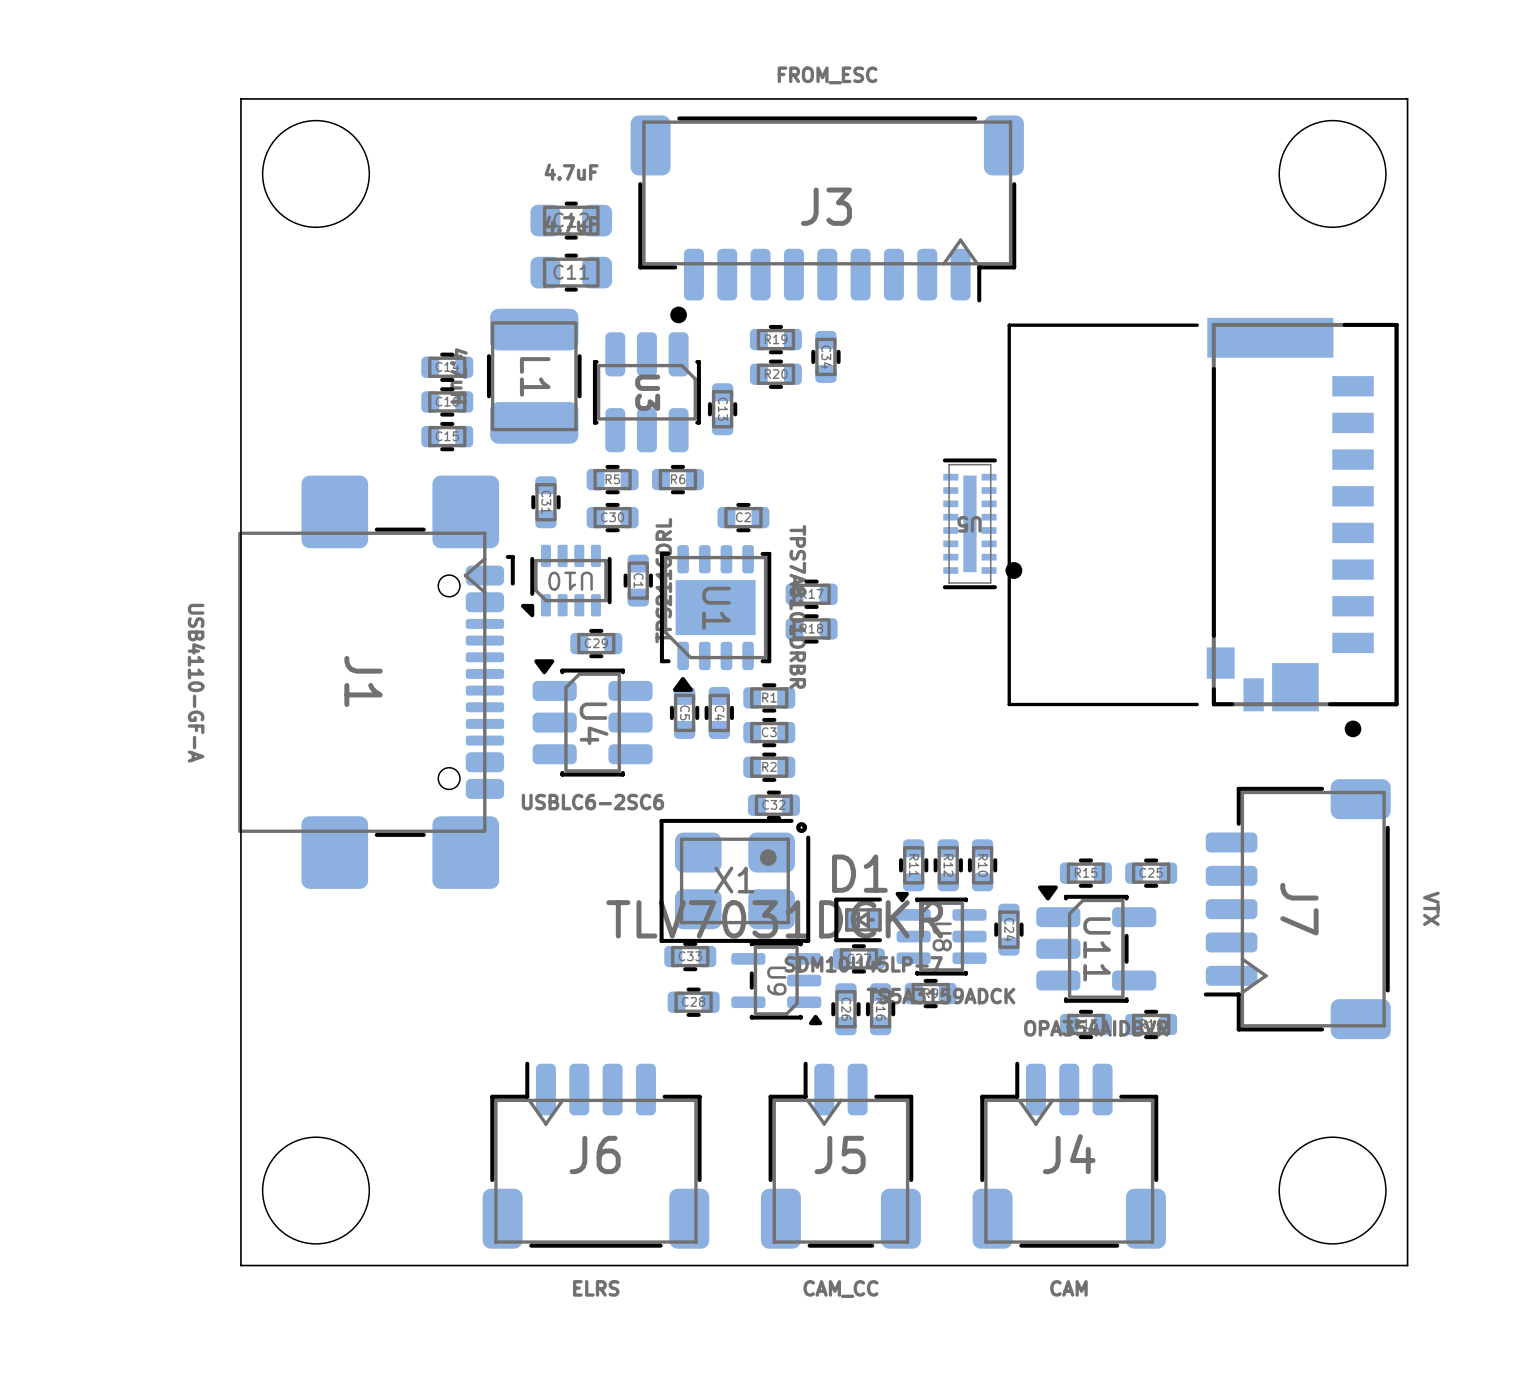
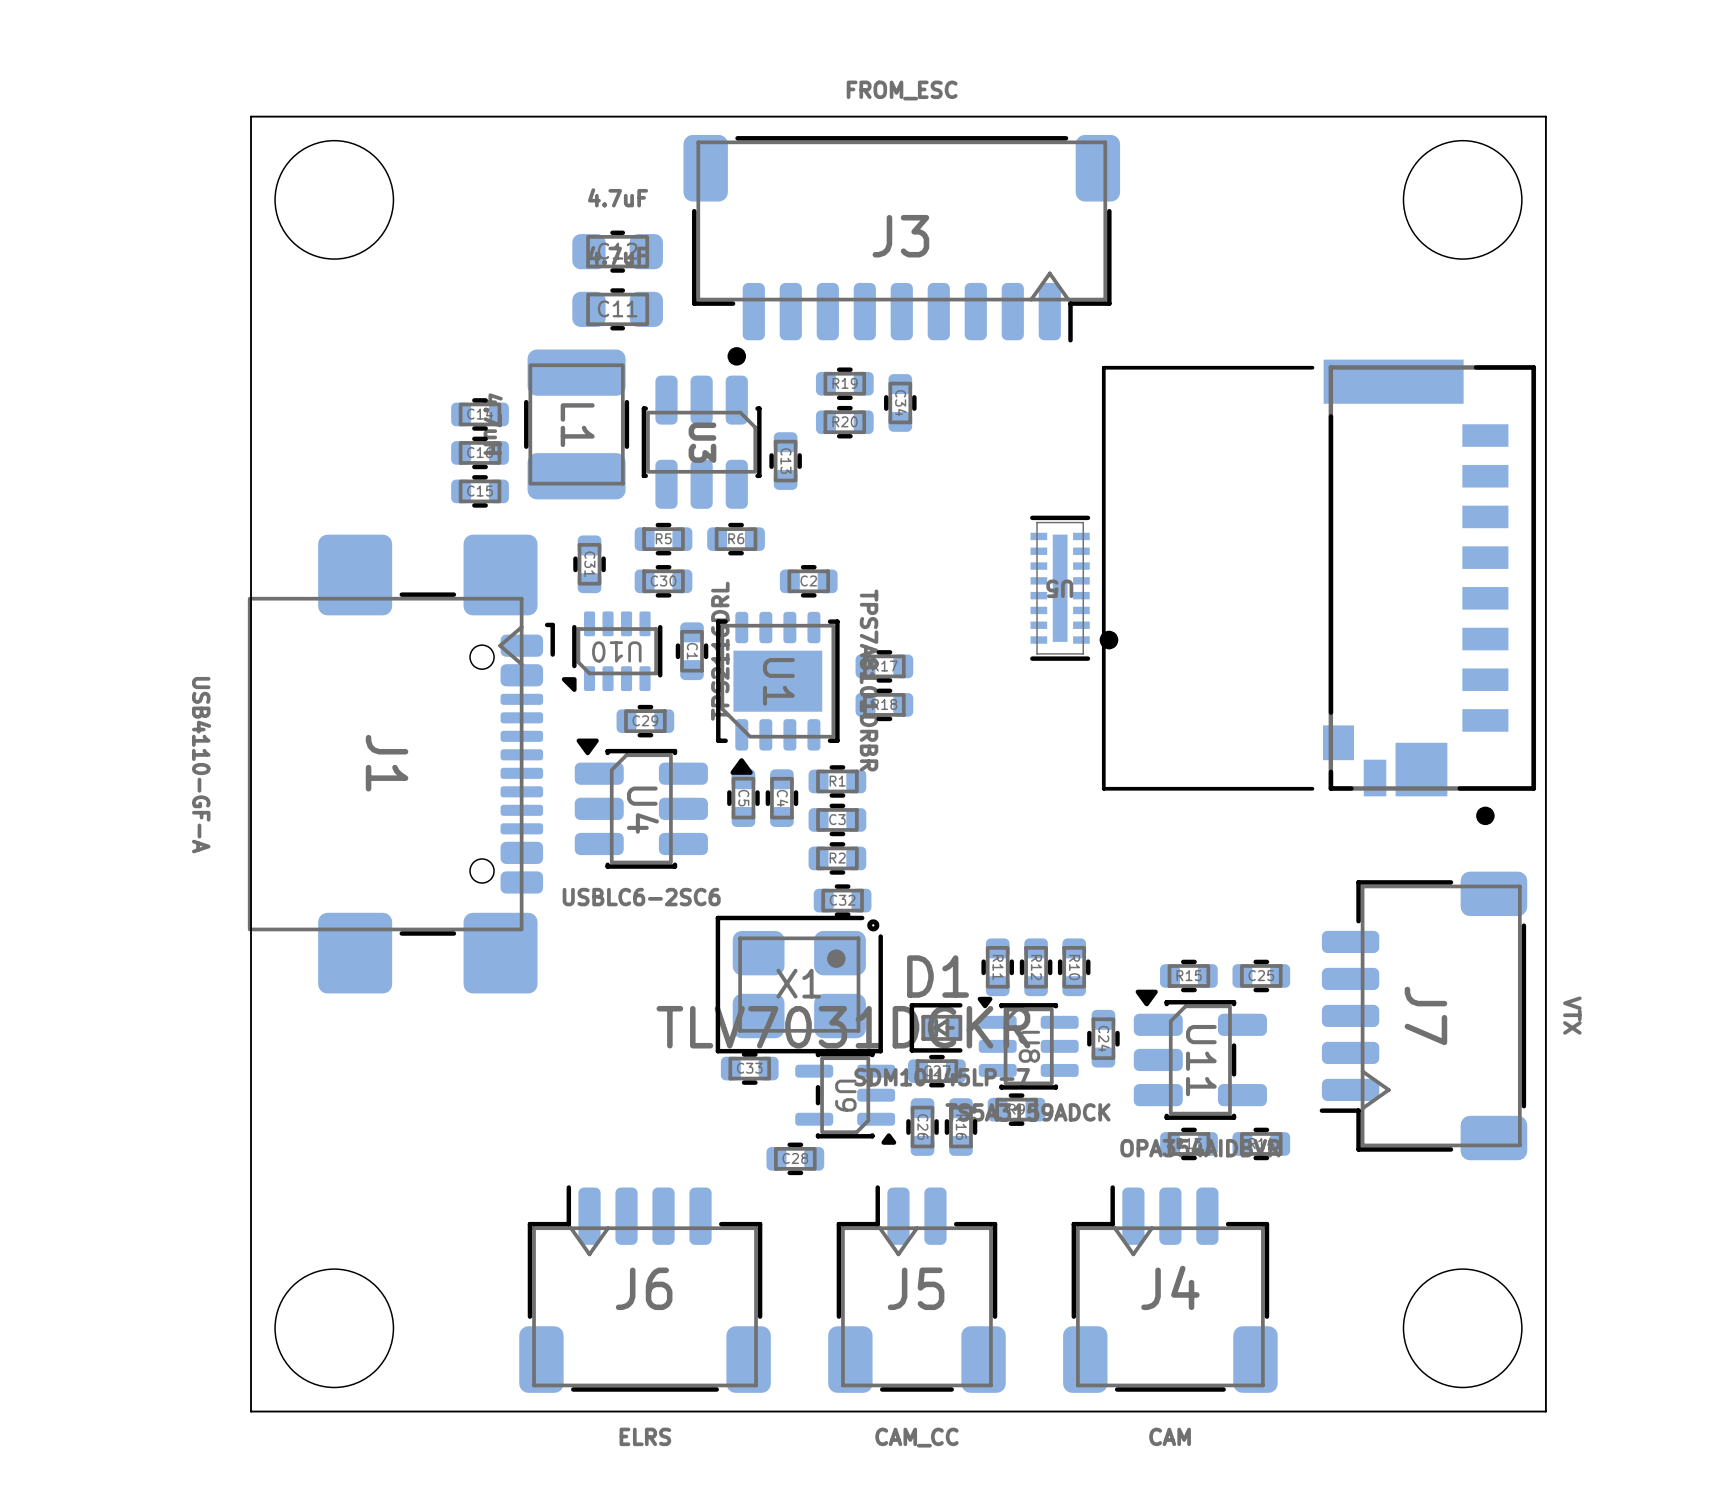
C28 position: (693, 1002) -> (795, 1158)

